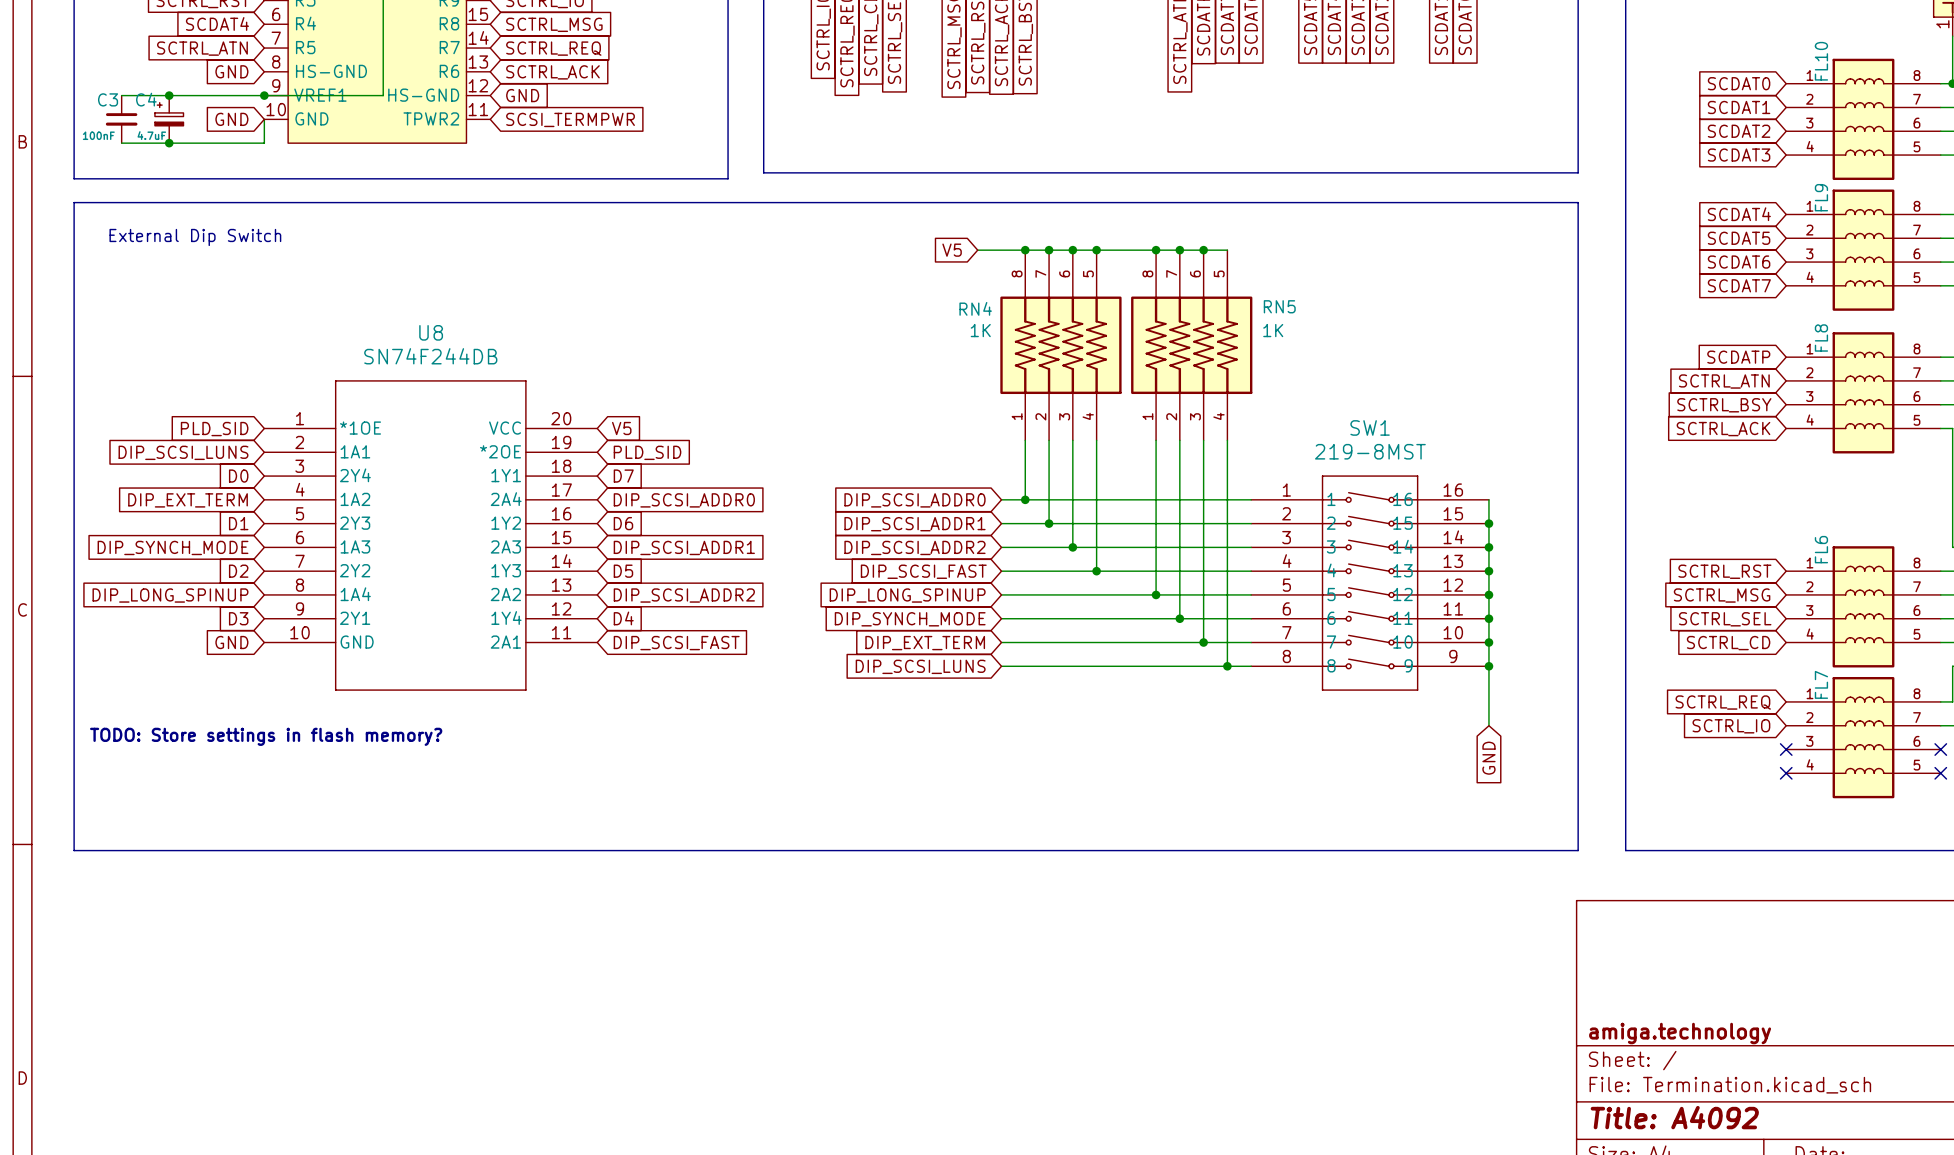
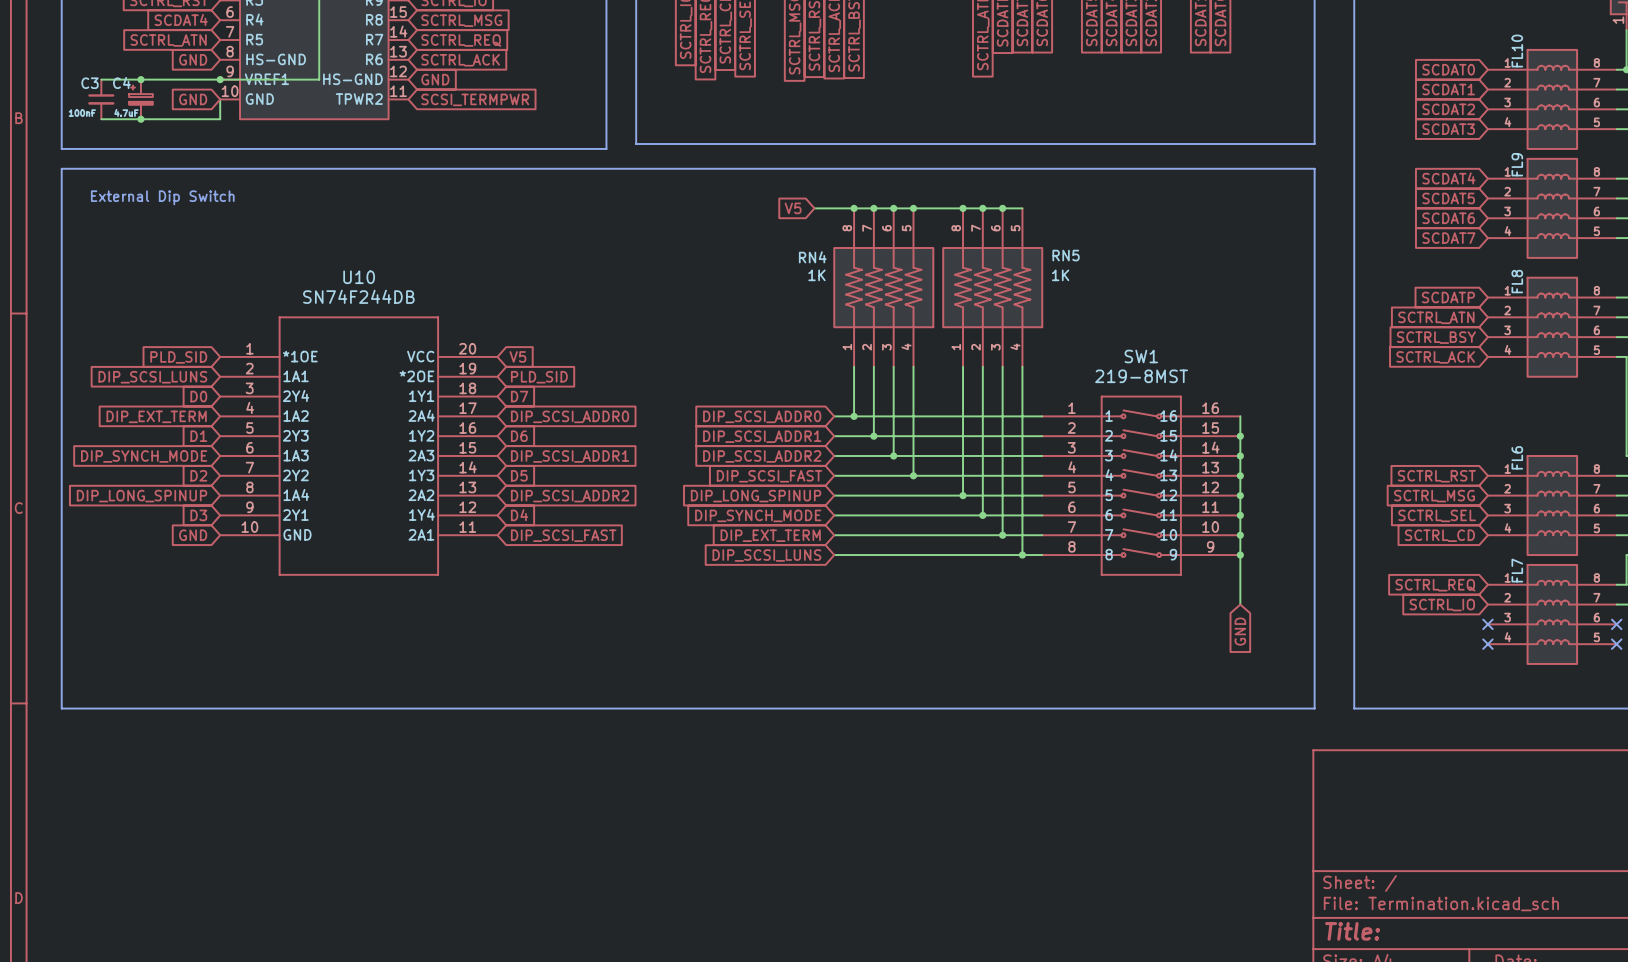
U8 name: U8 (431, 332) -> U10 (359, 277)
text: TODO: Store settings in flash memory? (266, 736) -> none
title block: amiga.technology (1680, 1033) -> none
title block: Title: A4092 (1674, 1117) -> Title: (1352, 931)

